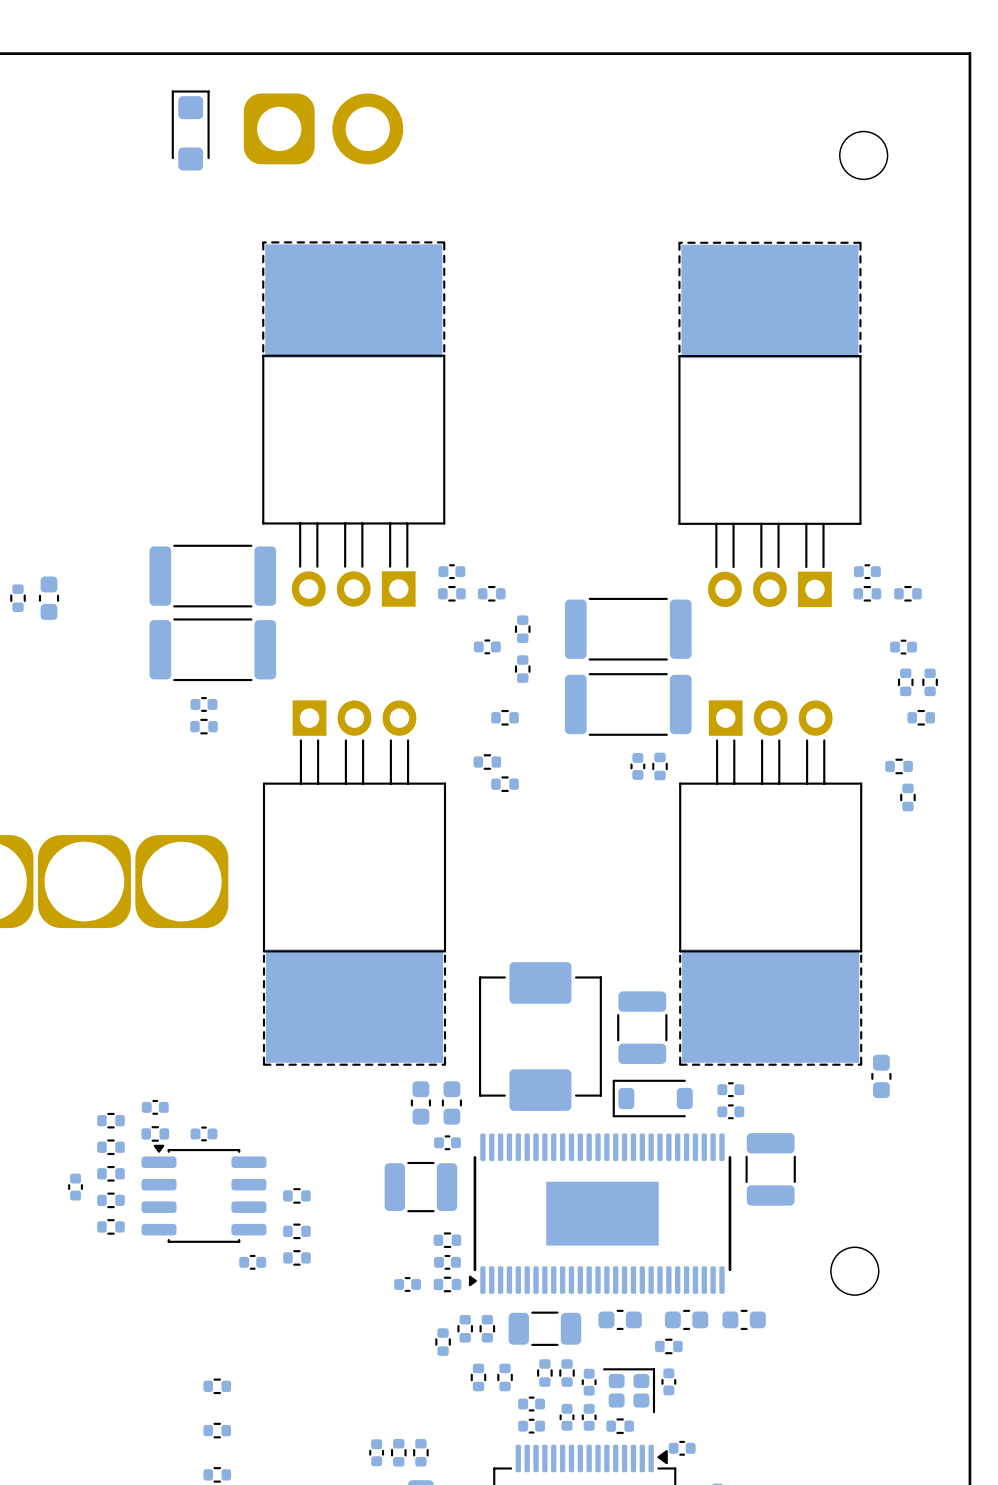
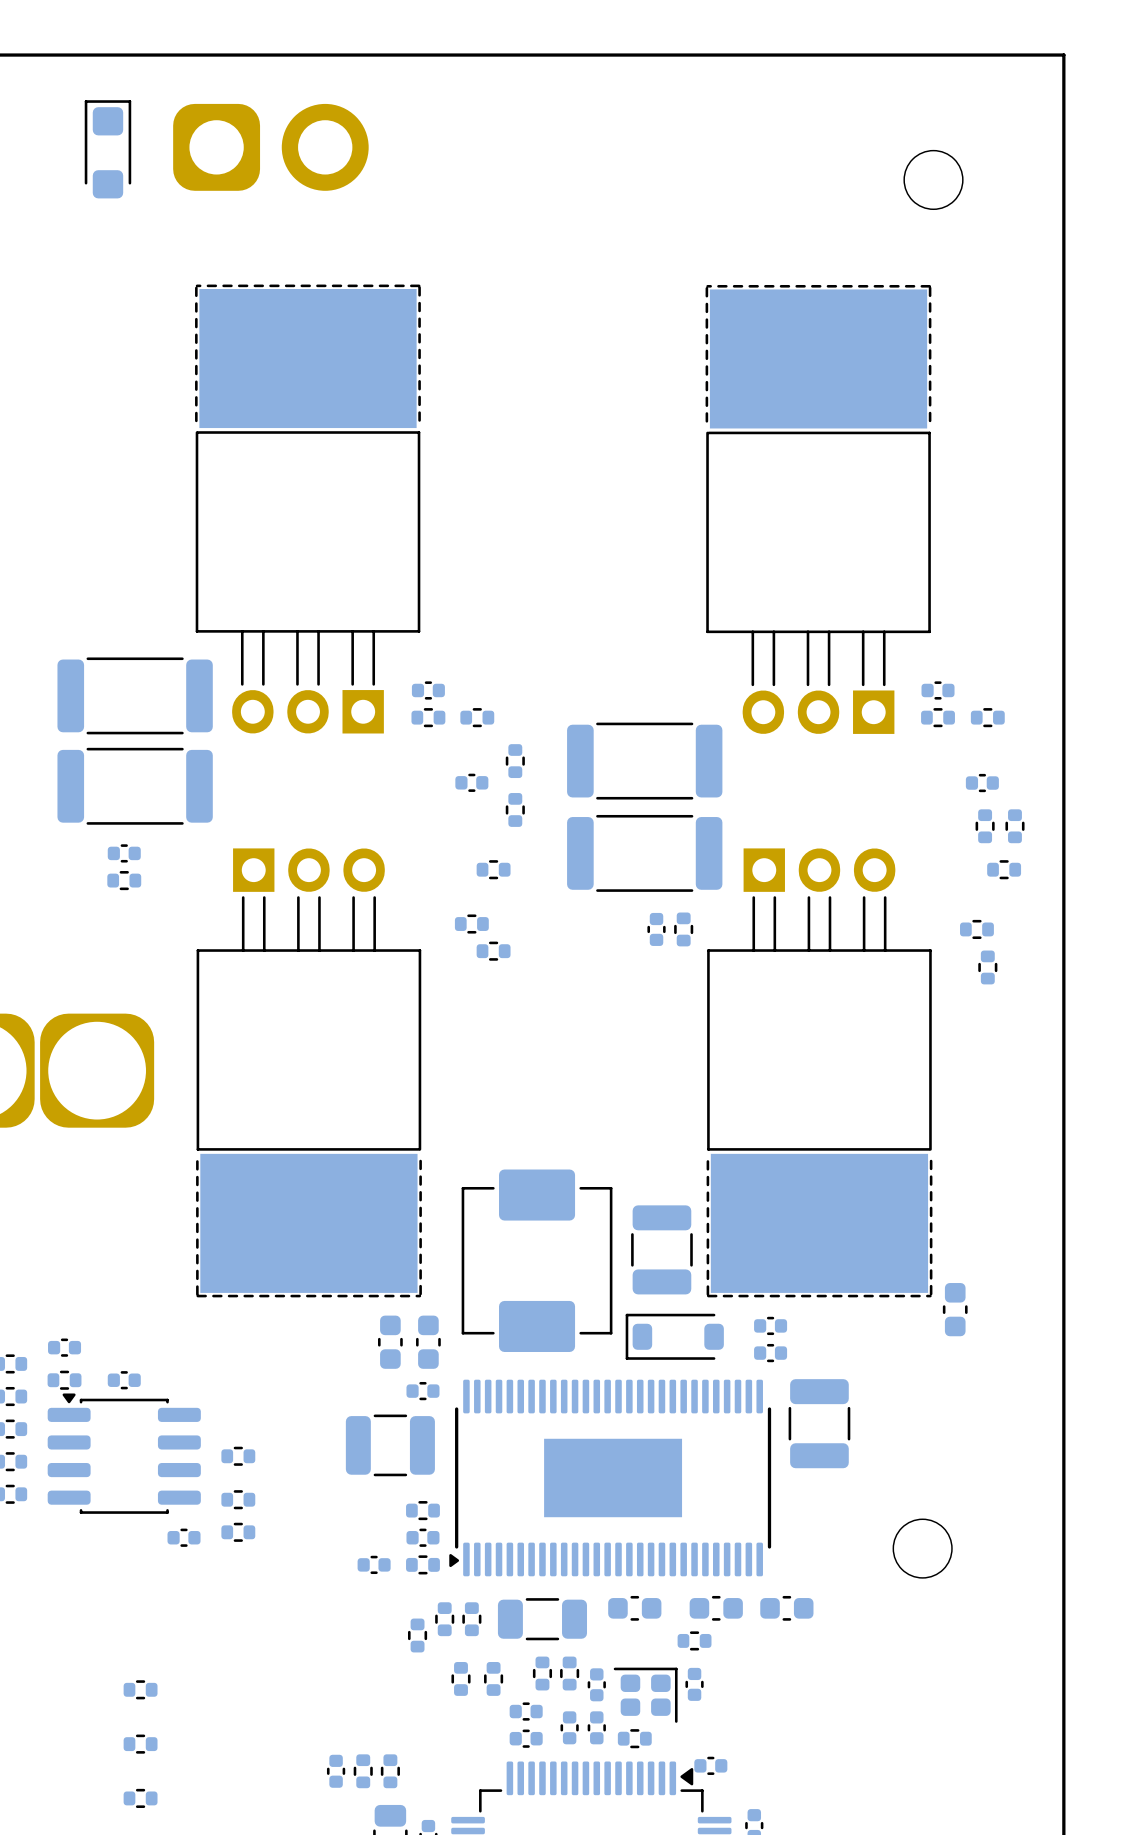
part footprint: [262, 241, 446, 607] -> [195, 284, 421, 734]
part footprint: [678, 241, 862, 608] -> [705, 284, 932, 734]
part footprint: [262, 700, 447, 1066] -> [196, 848, 422, 1298]
part footprint: [679, 700, 863, 1066] -> [706, 848, 933, 1298]

